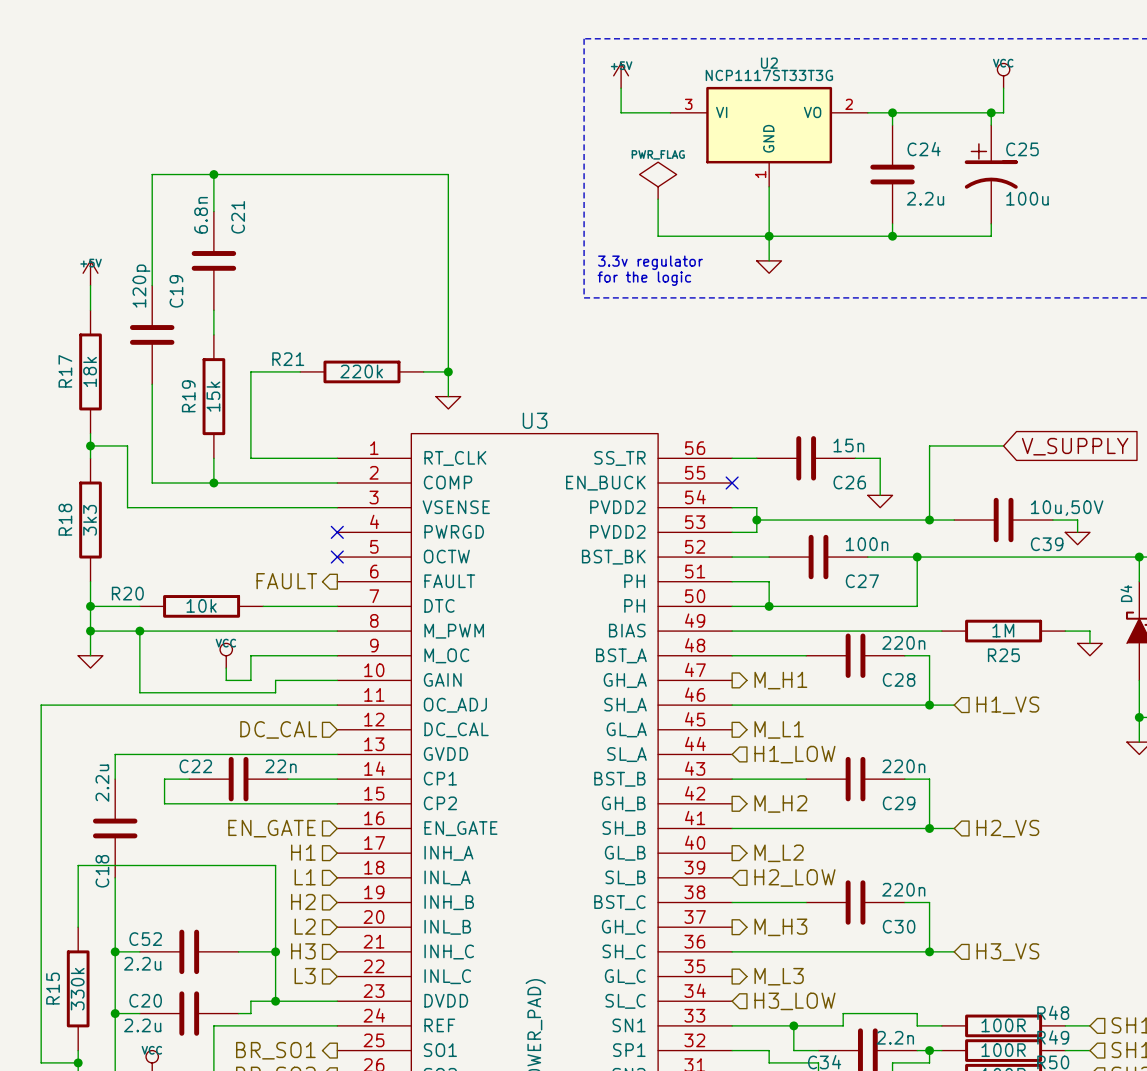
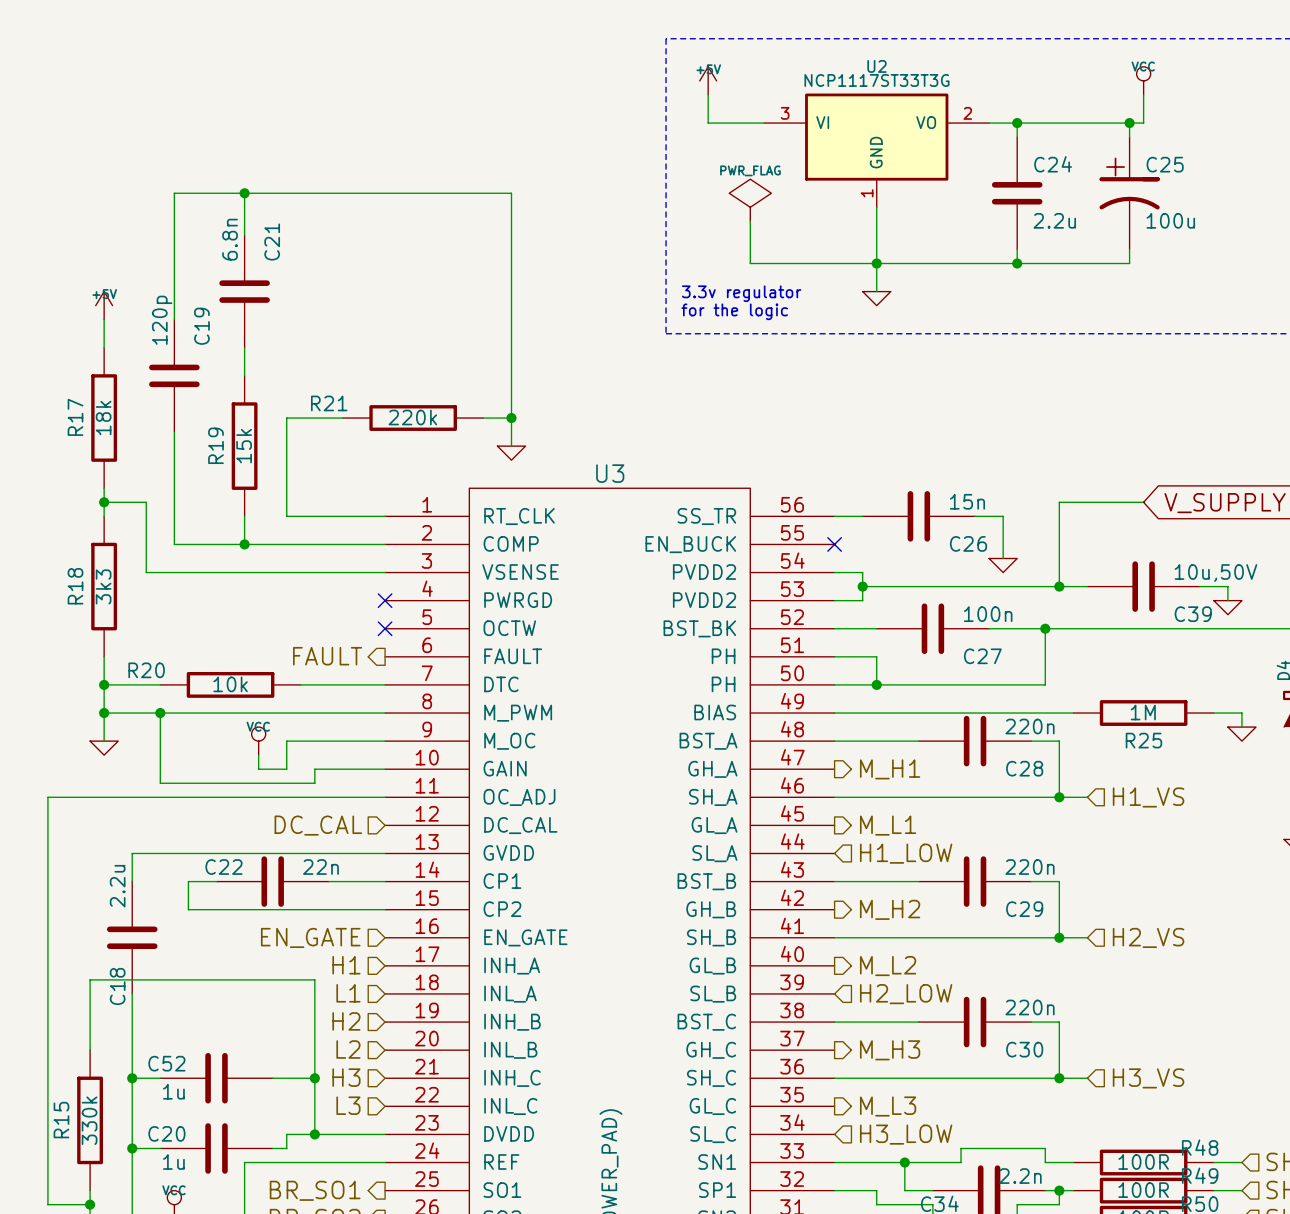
C52 value: 2.2u (142, 963) -> 1u (173, 1091)
C20 value: 2.2u (142, 1025) -> 1u (173, 1162)

